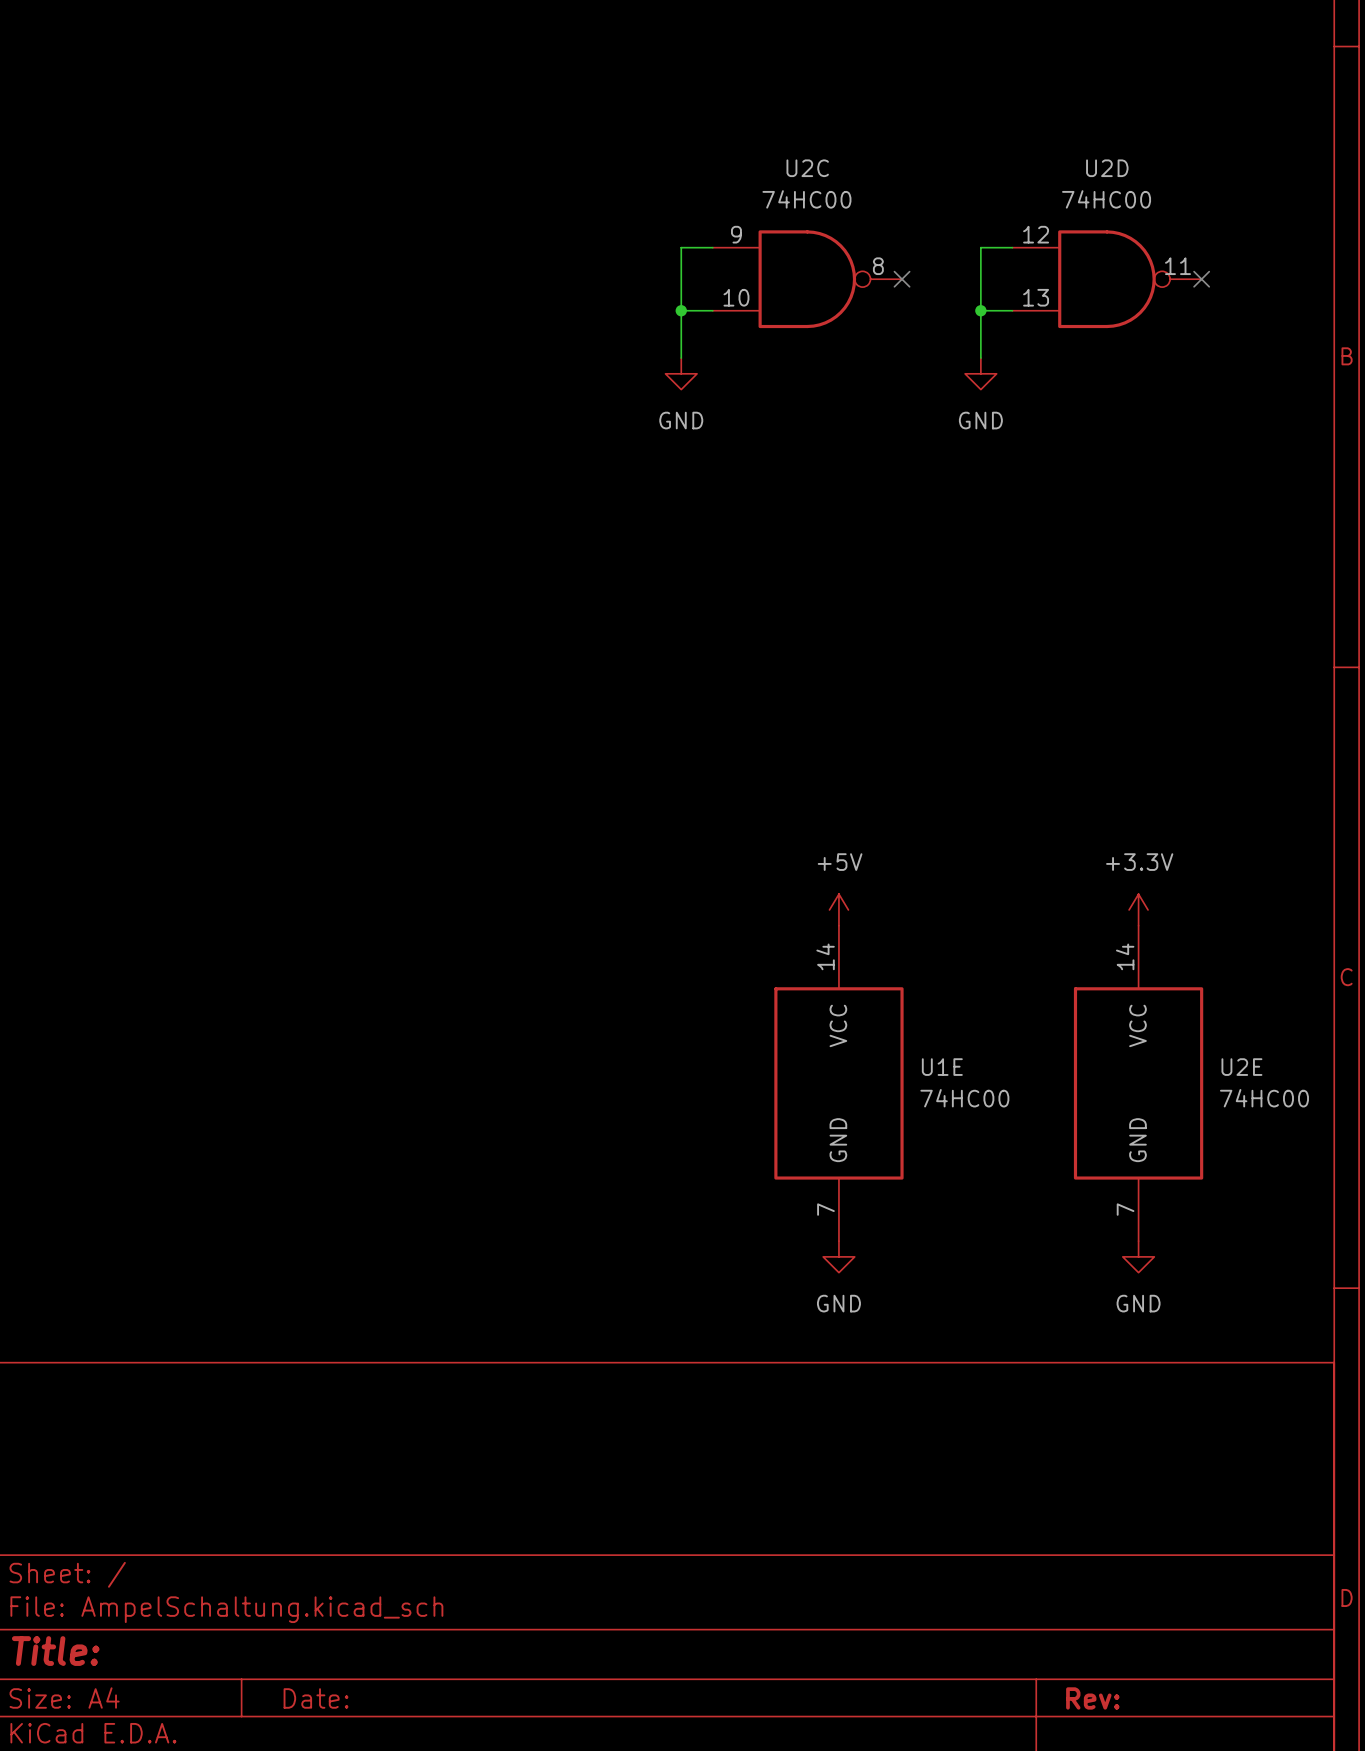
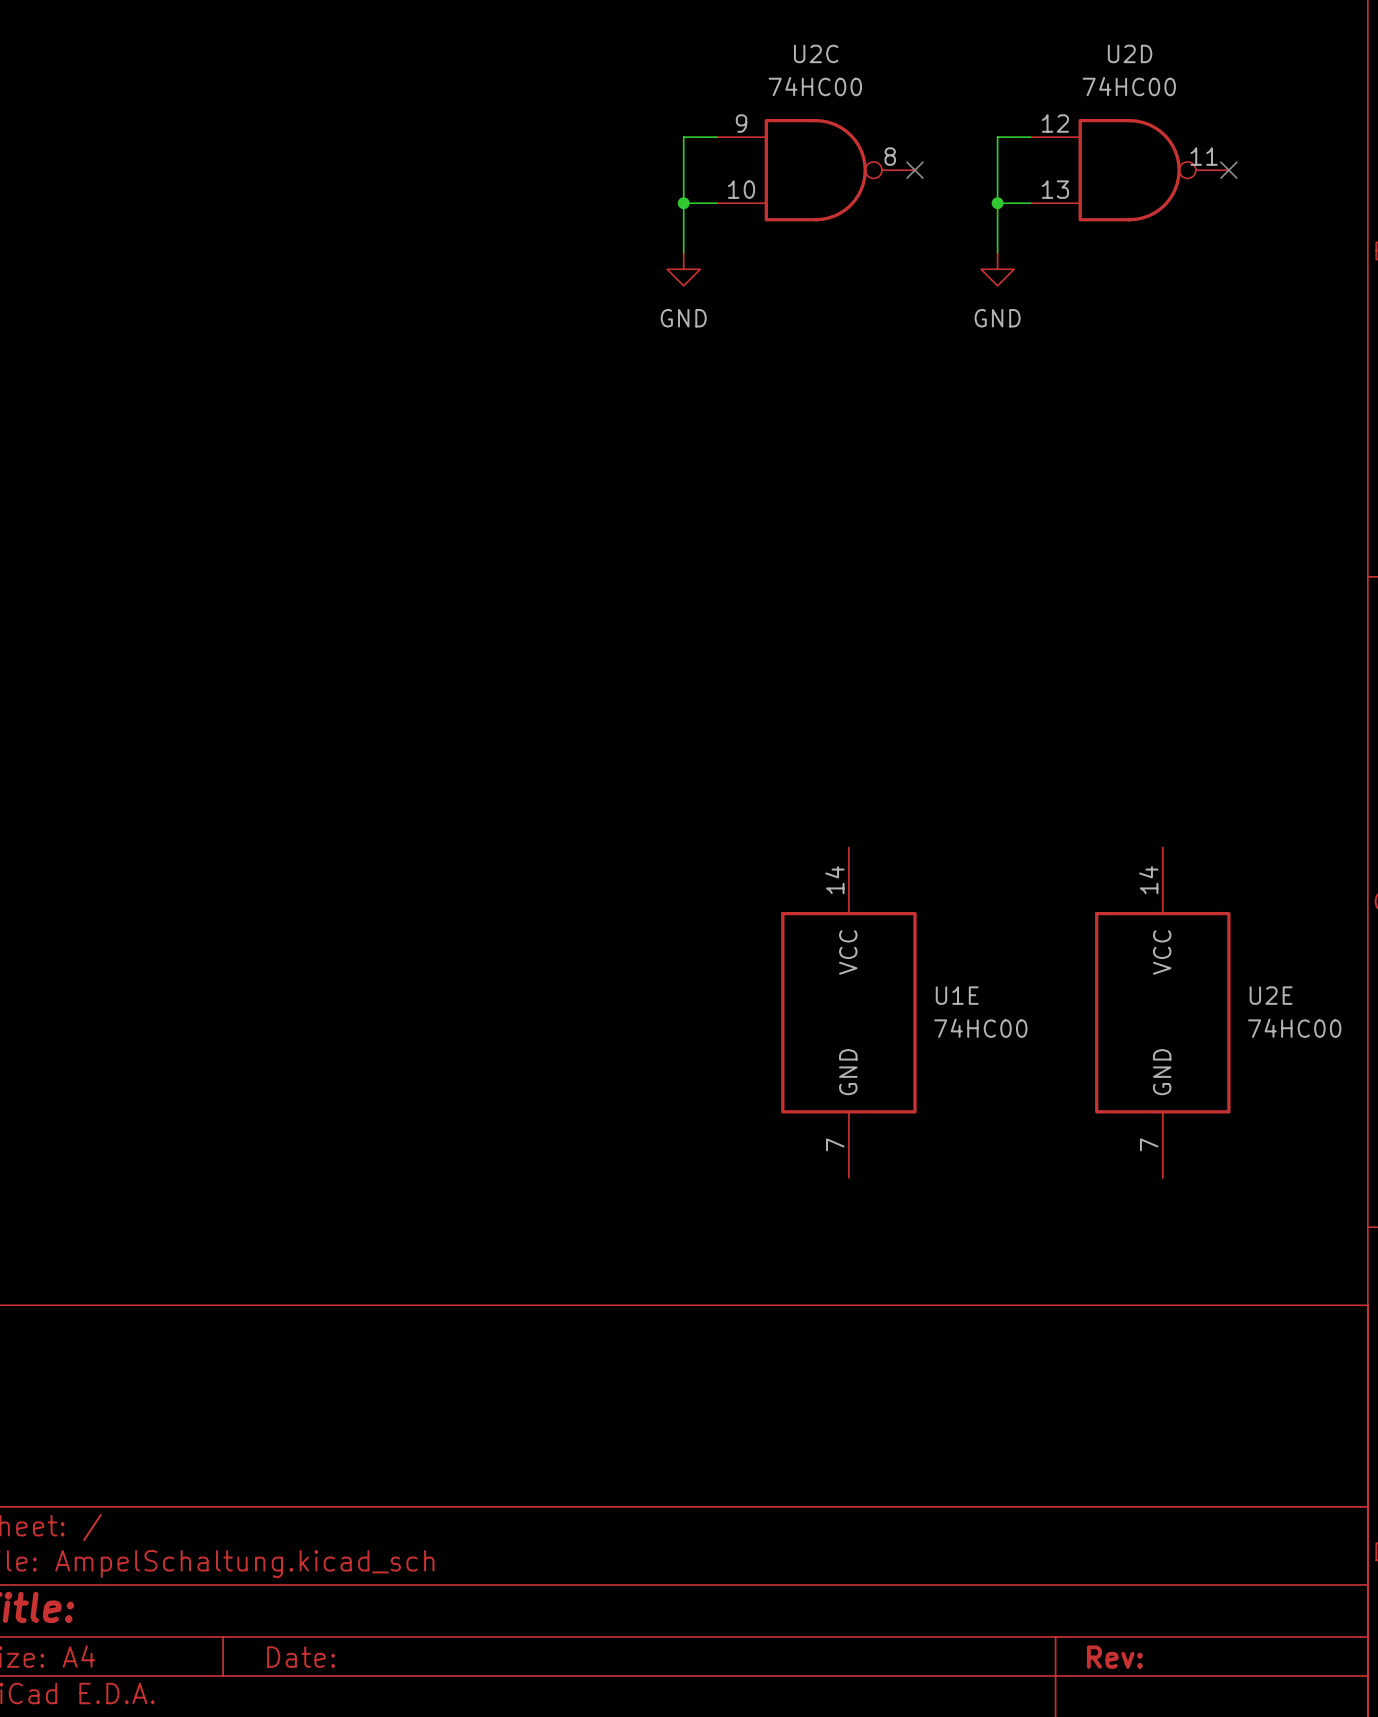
power symbol: +5V (838, 909) -> none
power symbol: +3.3V (1138, 909) -> none
power symbol: GND (838, 1256) -> none
power symbol: GND (1138, 1256) -> none

